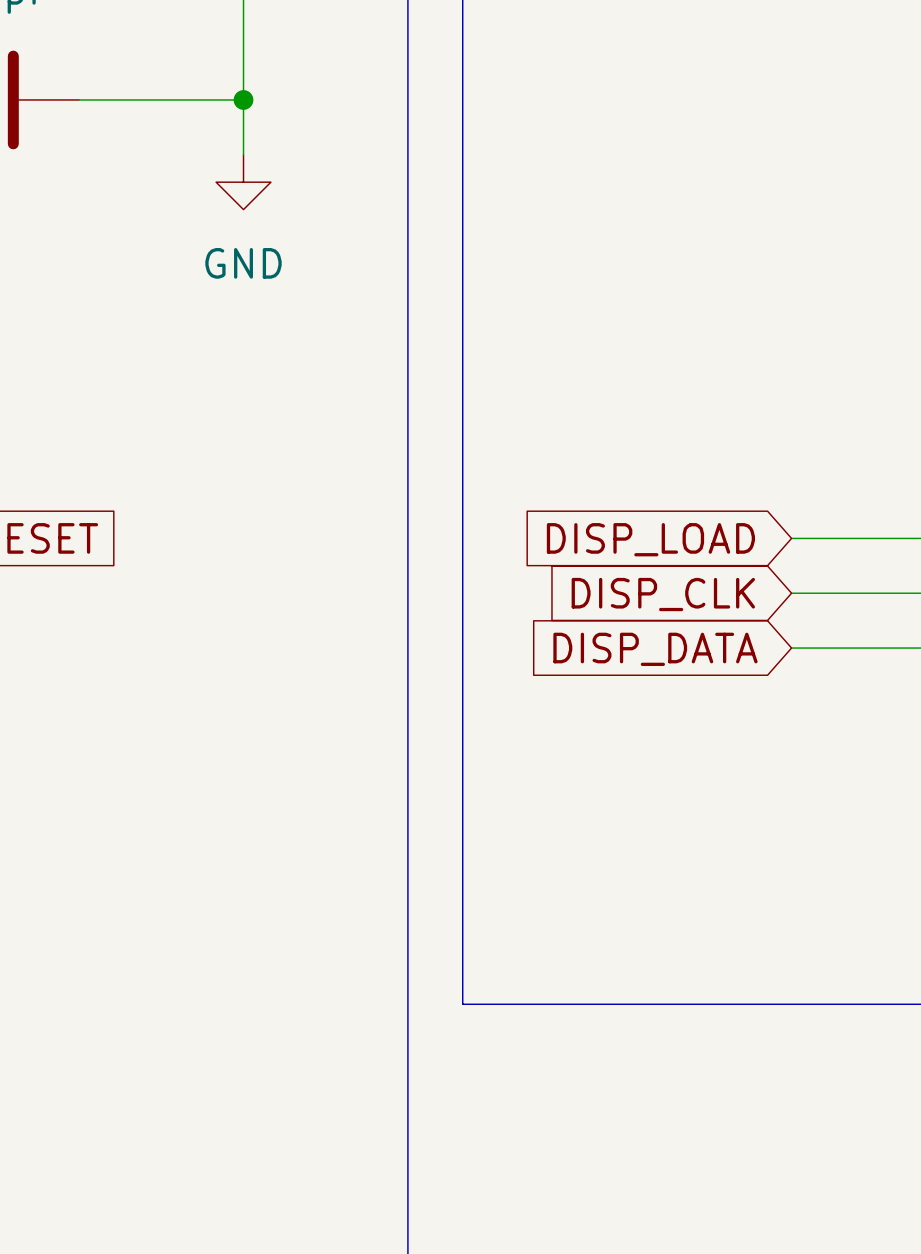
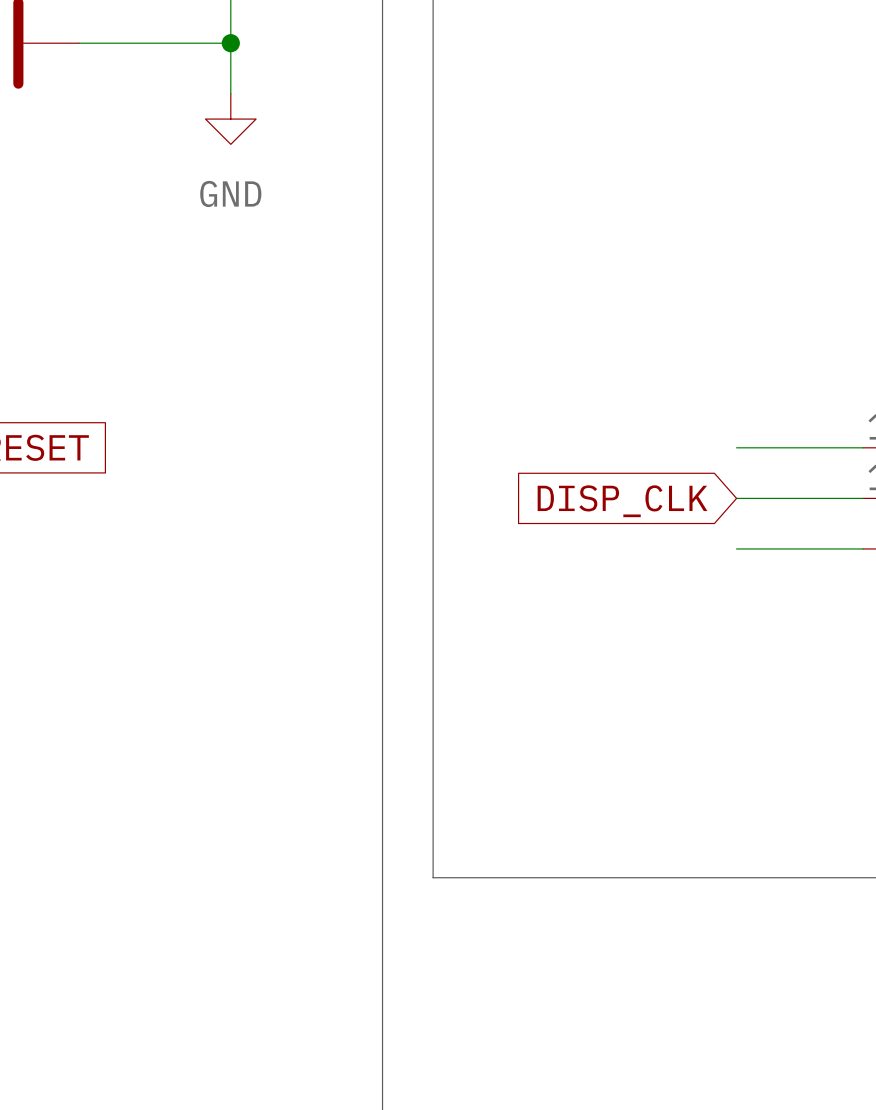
global label: DISP_LOAD (650, 539) -> none
global label: DISP_DATA (655, 649) -> none

